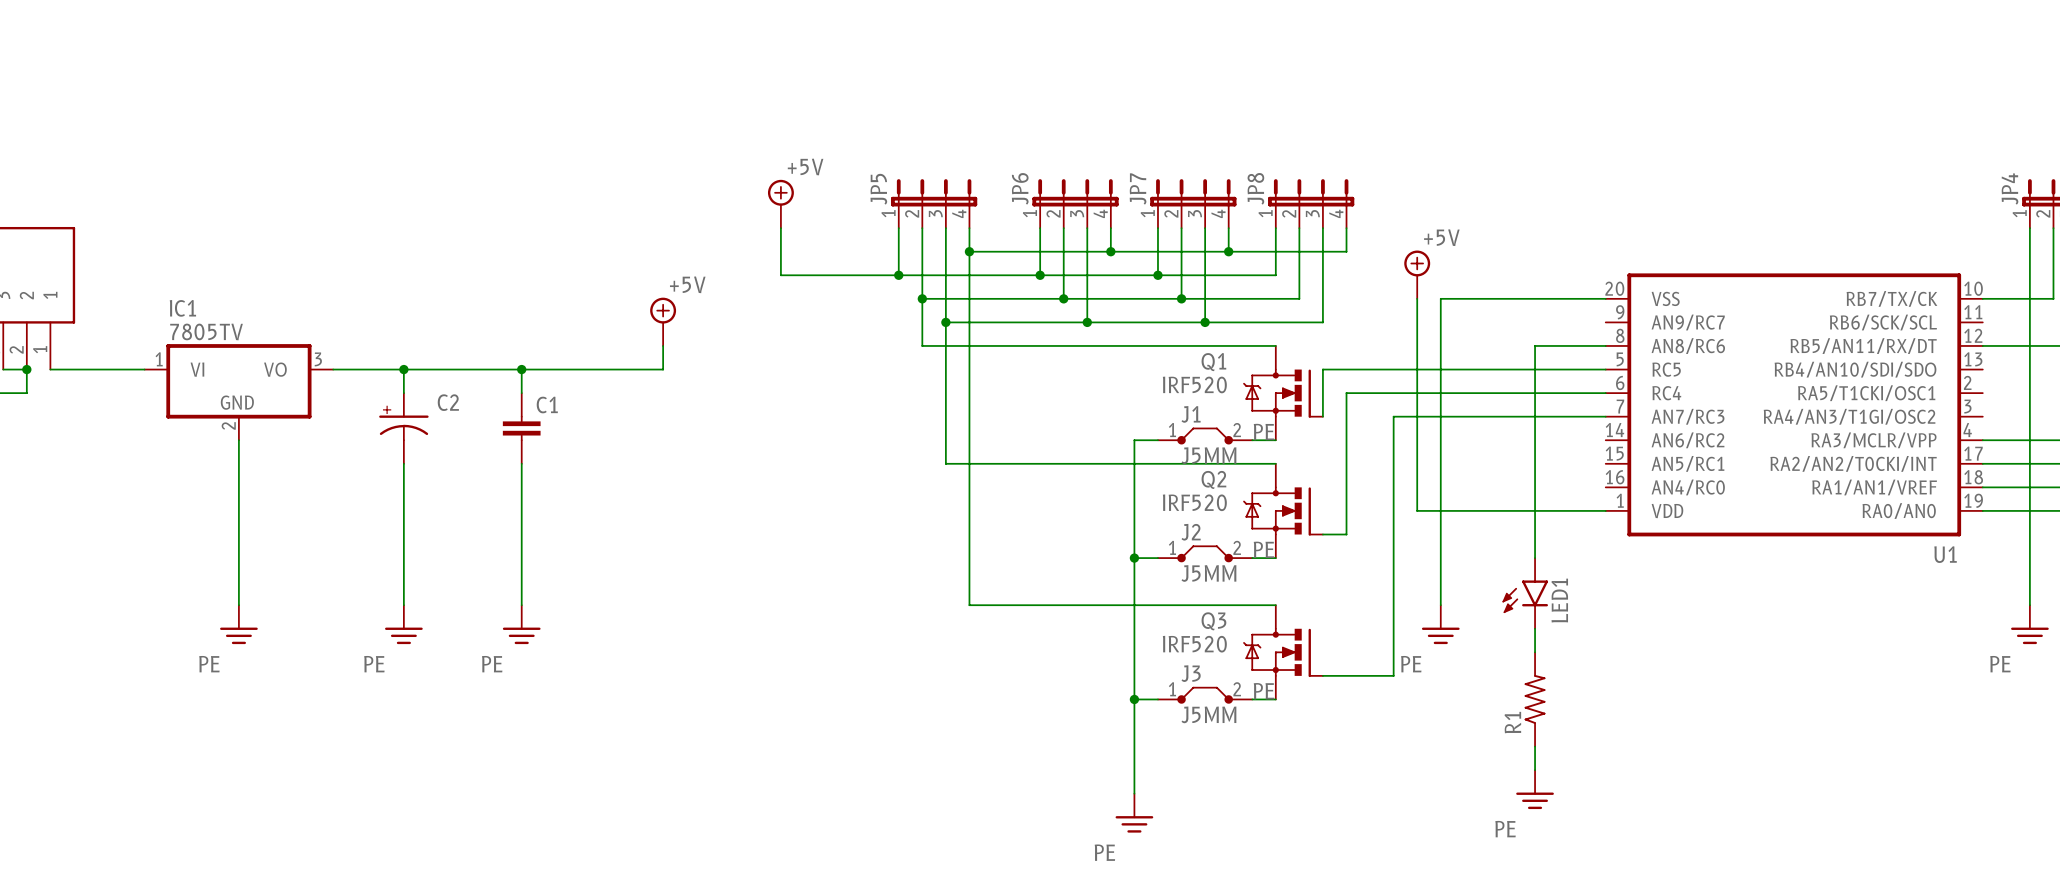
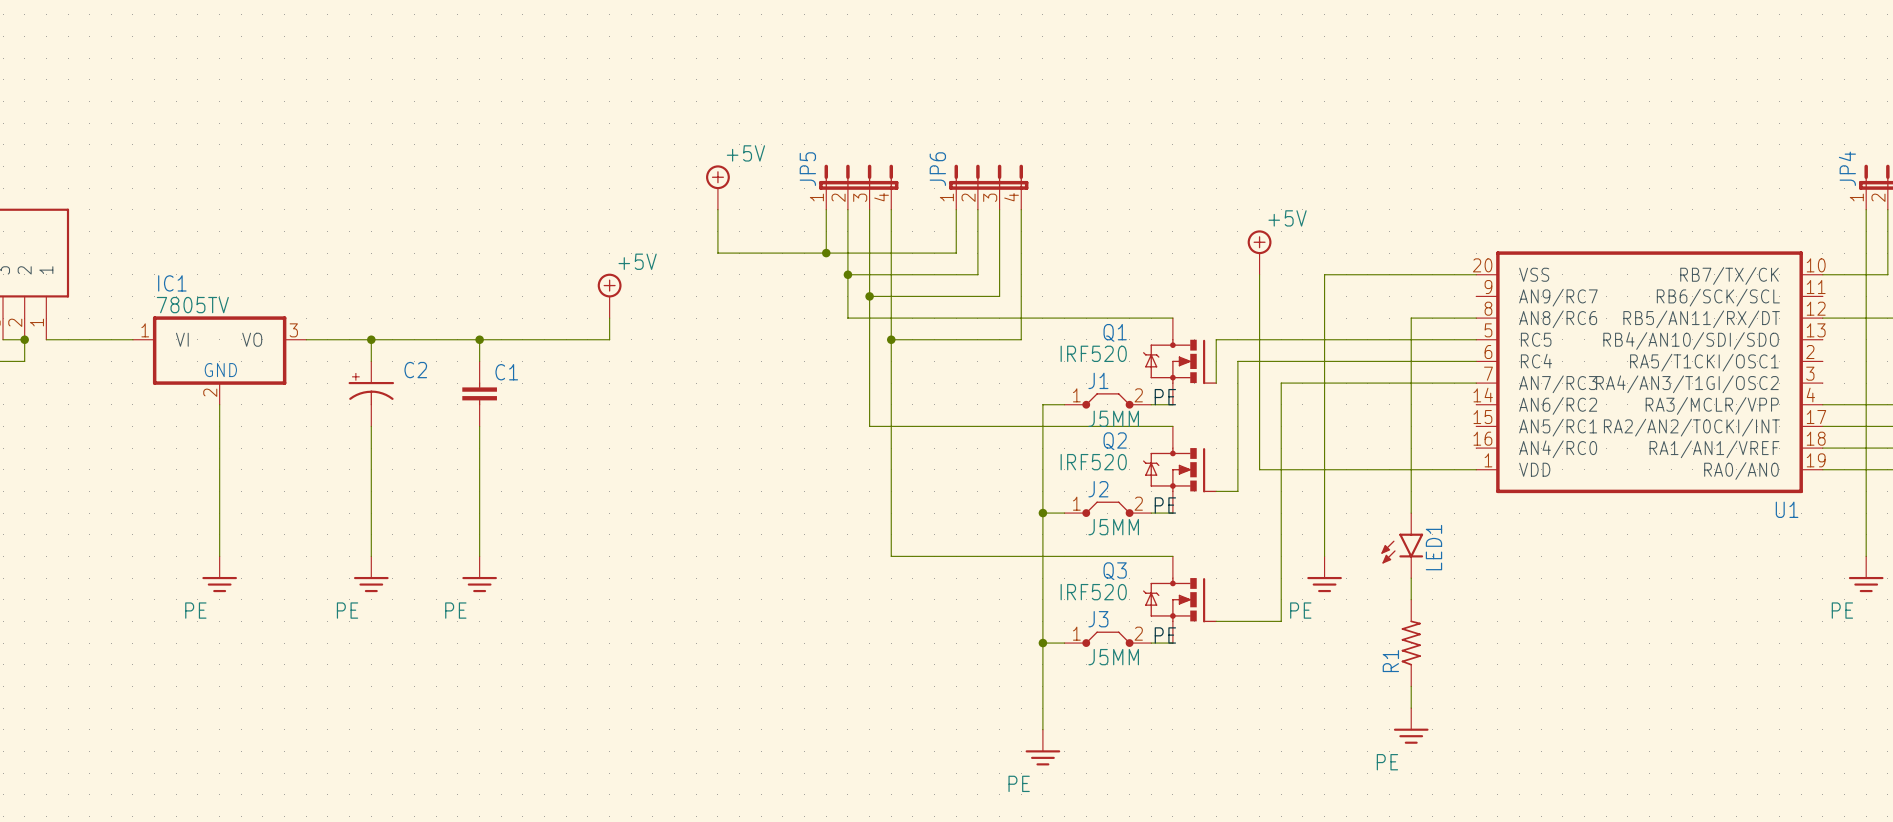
JP7: (1193, 203) -> none
JP8: (1311, 203) -> none
wire: (1157, 228) (1157, 275) -> none
wire: (1181, 228) (1181, 298) -> none
wire: (1205, 228) (1205, 322) -> none
wire: (1228, 228) (1228, 251) -> none
wire: (1275, 228) (1275, 275) (1040, 275) -> none
wire: (1299, 228) (1299, 298) (1063, 298) -> none
wire: (1322, 228) (1322, 322) (1087, 322) -> none
wire: (1346, 228) (1346, 251) (969, 251) -> none
junction: (969, 251) -> none
wire: none -> (1021, 231) (1021, 339) (891, 339)
junction: (1110, 251) -> none
junction: (1228, 251) -> none
power symbol position: +5V (1417, 274) -> +5V (1259, 252)
junction: (1040, 275) -> none
junction: (1157, 275) -> none
junction: (1063, 298) -> none
junction: (1181, 298) -> none
wire: (1417, 298) (1417, 510) -> (1259, 274) (1259, 469) (1302, 469)
junction: (1087, 322) -> none
junction: (1205, 322) -> none
junction: none -> (891, 339)

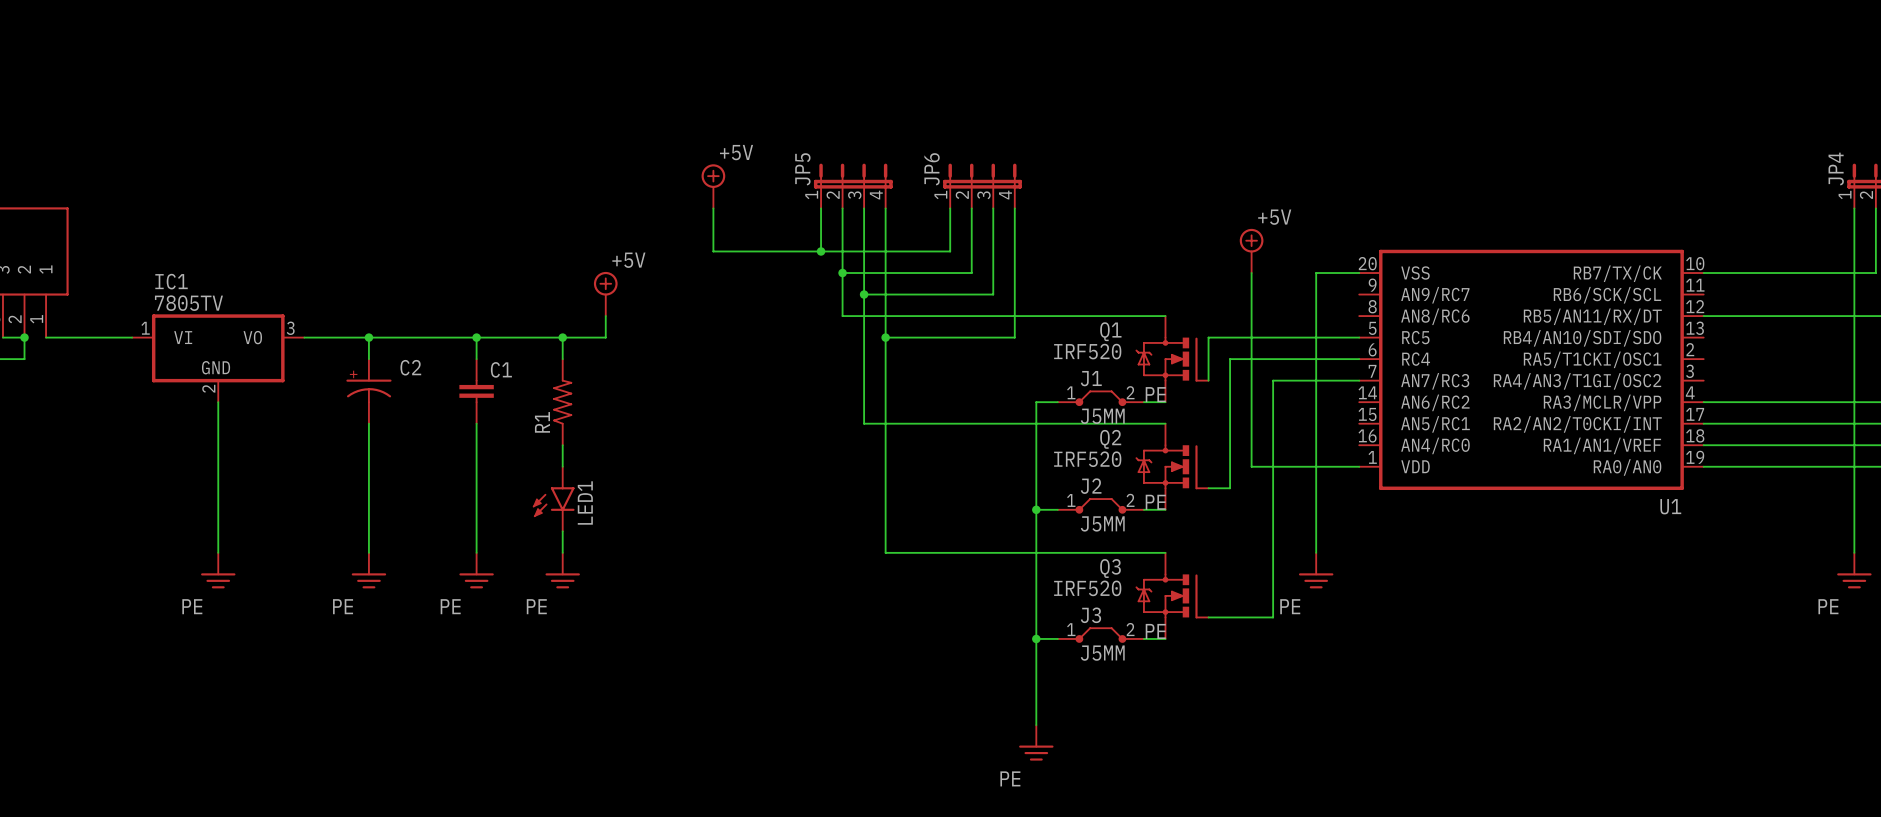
wire: (1367, 274) (1476, 274) -> none
wire: none -> (1703, 273) (1811, 273)
wire: (1476, 318) (1411, 318) (1411, 513) -> none
wire: none -> (1703, 316) (1811, 316)
wire: none -> (562, 337) (562, 359)
junction: none -> (562, 337)
wire: (1367, 339) (1476, 339) -> none
wire: (1367, 361) (1476, 361) -> none
U1 position: (1649, 372) -> (1531, 369)
wire: (1367, 383) (1476, 383) -> none
wire: none -> (1703, 402) (1811, 402)
wire: none -> (1703, 423) (1811, 423)
wire: none -> (562, 445) (562, 466)
wire: none -> (1703, 445) (1811, 445)
wire: (1367, 469) (1476, 469) -> none
wire: none -> (1703, 466) (1811, 466)
wire: none -> (562, 531) (562, 552)
LED1 position: (1402, 545) -> (553, 499)
power symbol: none -> PE (562, 570)
wire: (1411, 578) (1411, 599) -> none
R1 position: (1411, 643) -> (562, 402)
wire: (1411, 686) (1411, 708) -> none
power symbol: PE (1411, 725) -> none

